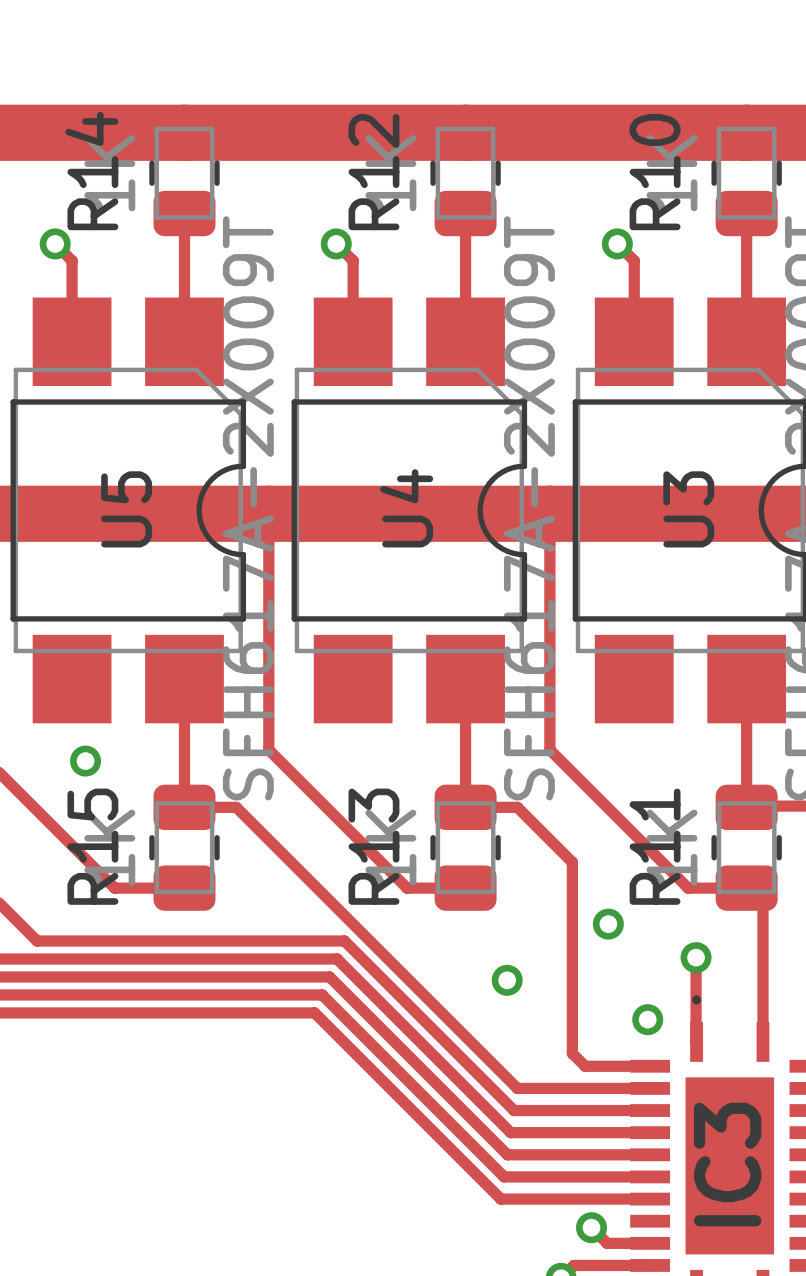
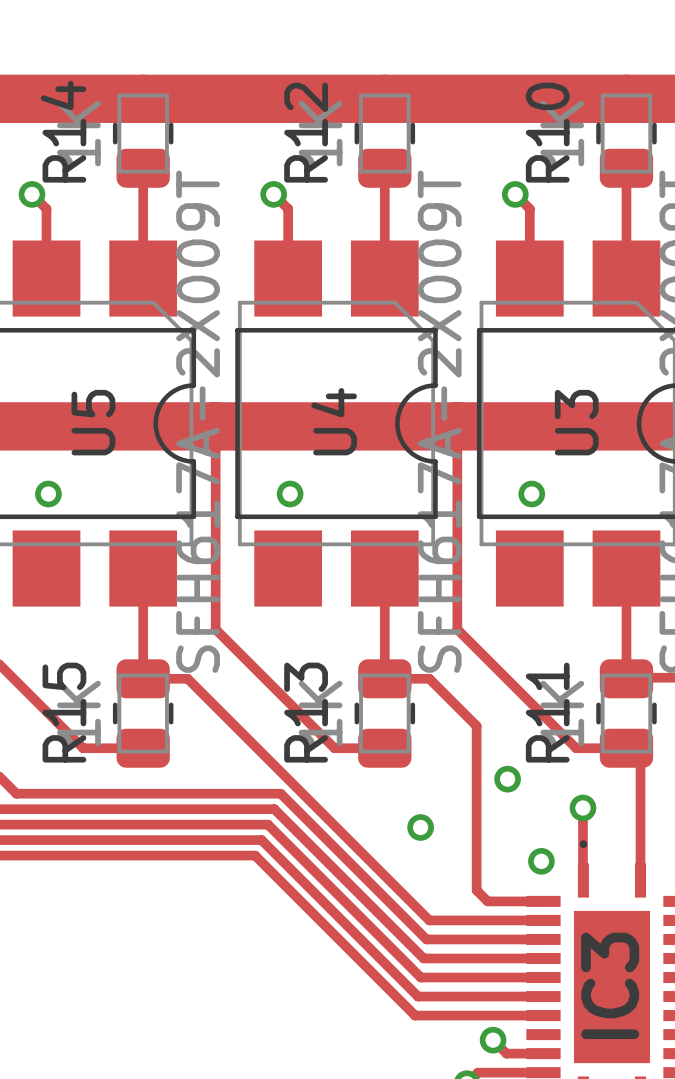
via: none -> (48, 494)
via: none -> (290, 494)
via: none -> (531, 494)
via: (85, 761) -> none

